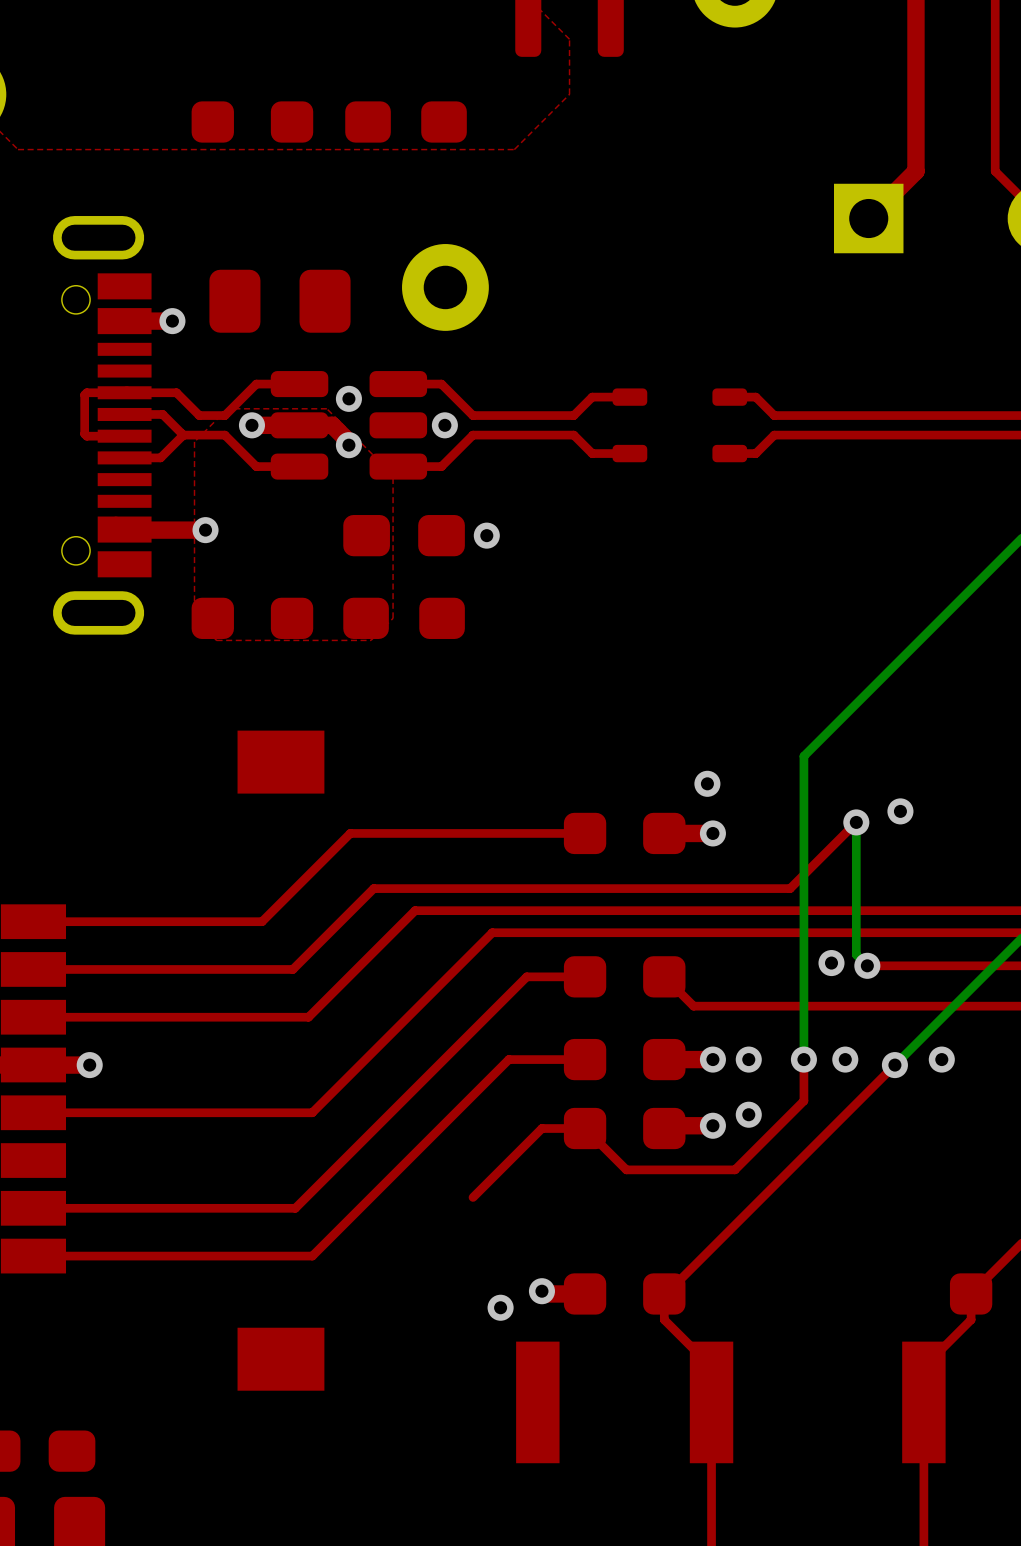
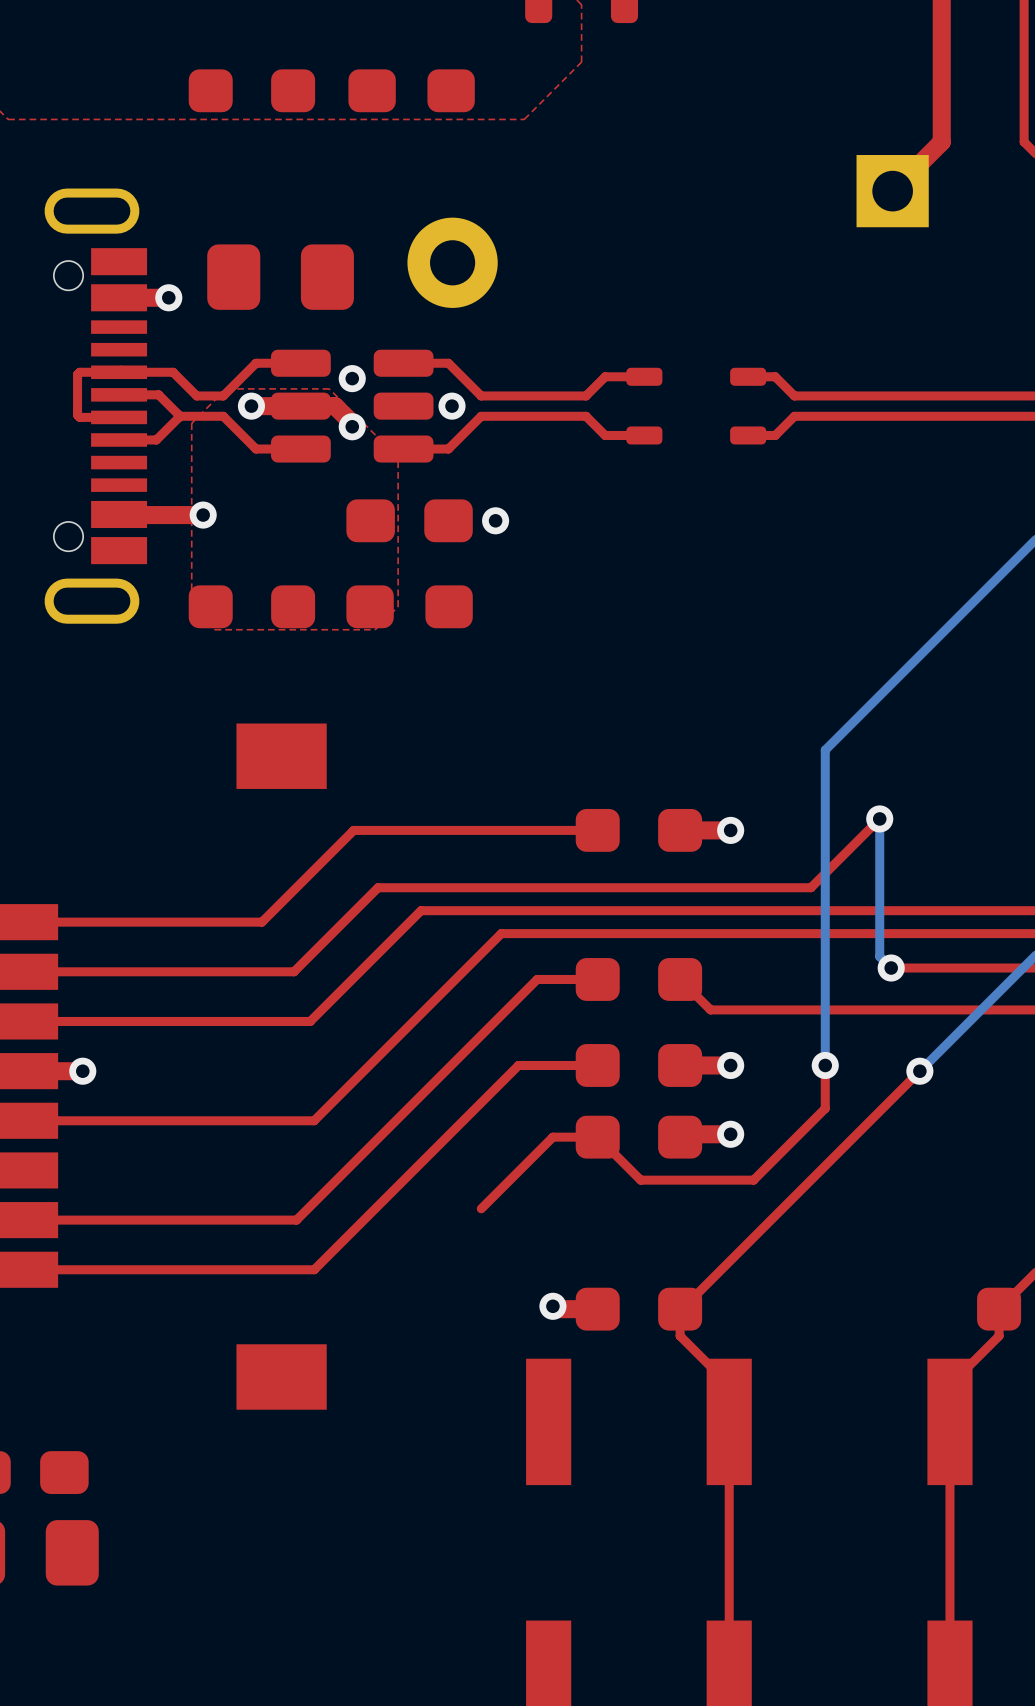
via: (707, 783) -> none
via: (900, 811) -> none
via: (831, 963) -> none
via: (748, 1059) -> none
via: (845, 1059) -> none
via: (941, 1059) -> none
via: (748, 1114) -> none
via: (500, 1307) -> none

